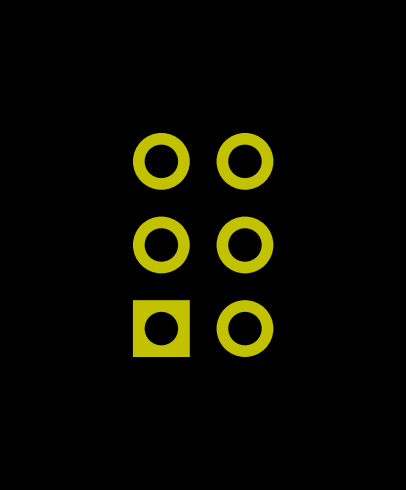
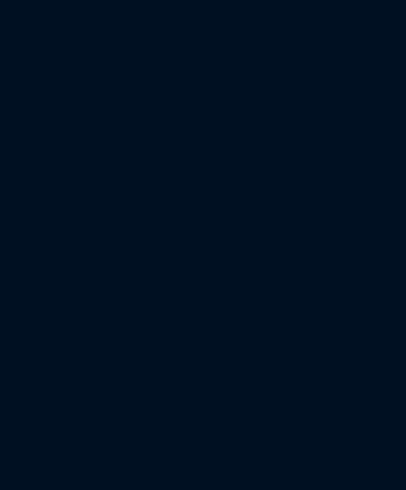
part: (203, 244) -> none

